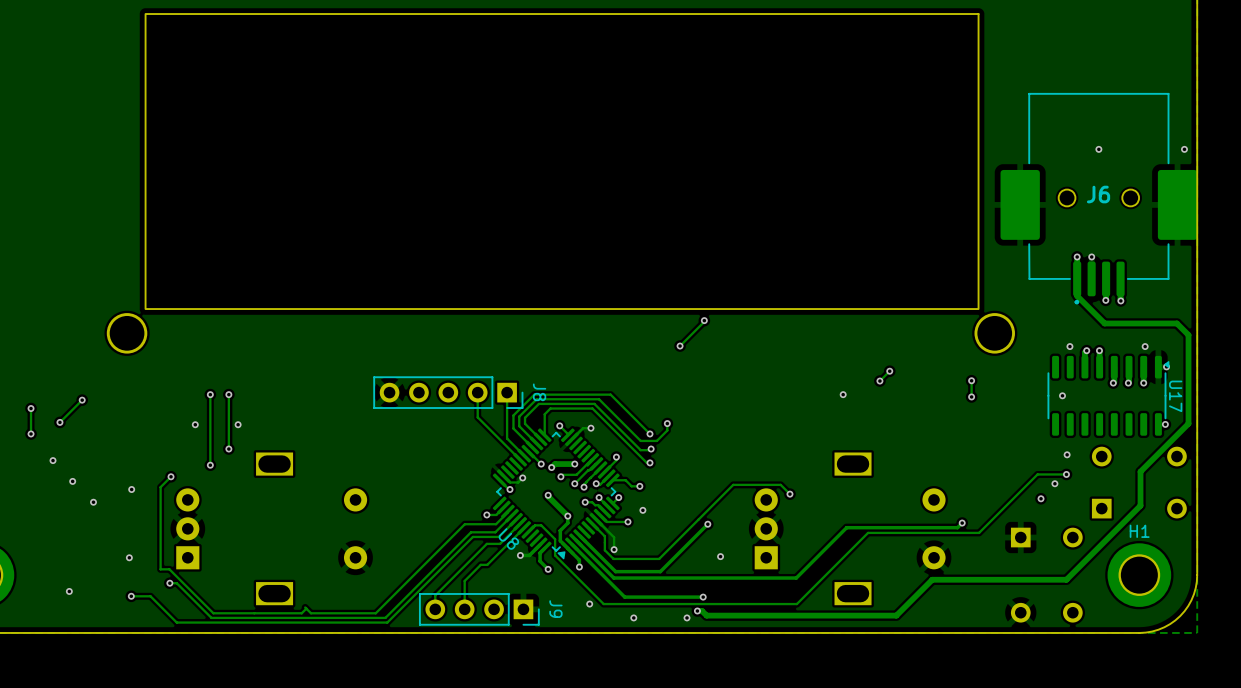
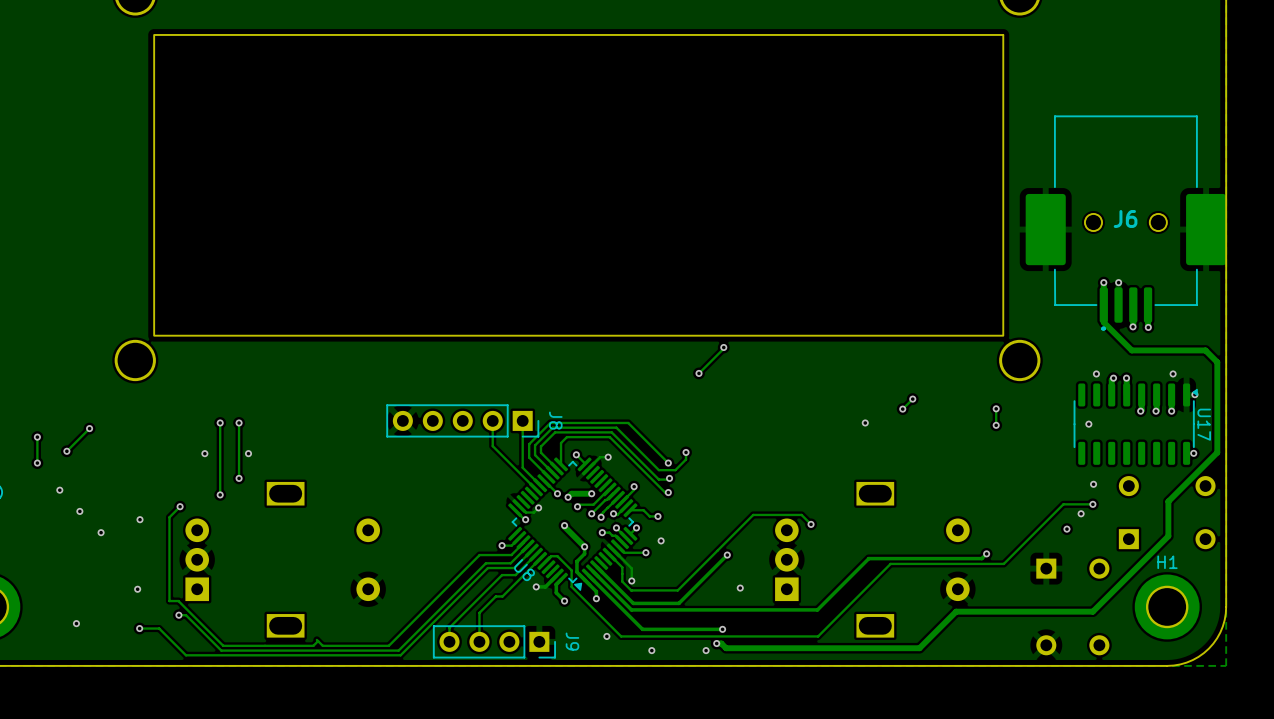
via: (1098, 149) -> none
via: (1184, 149) -> none

